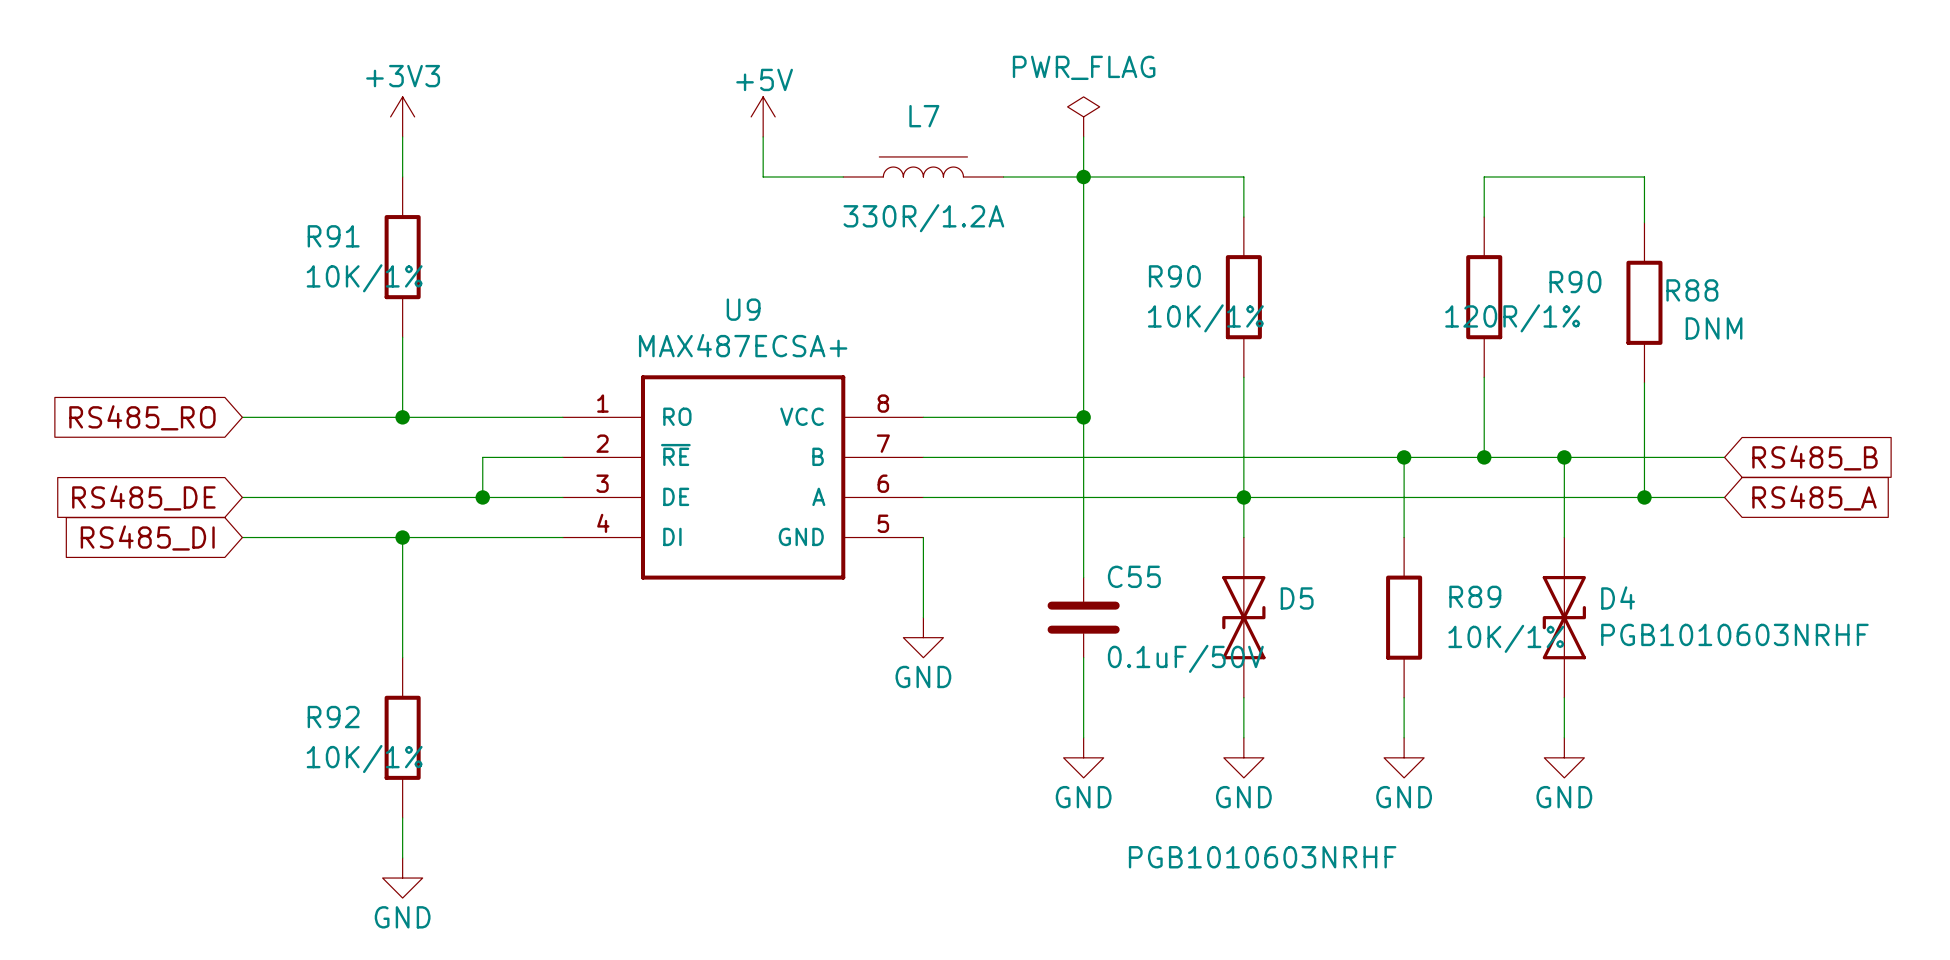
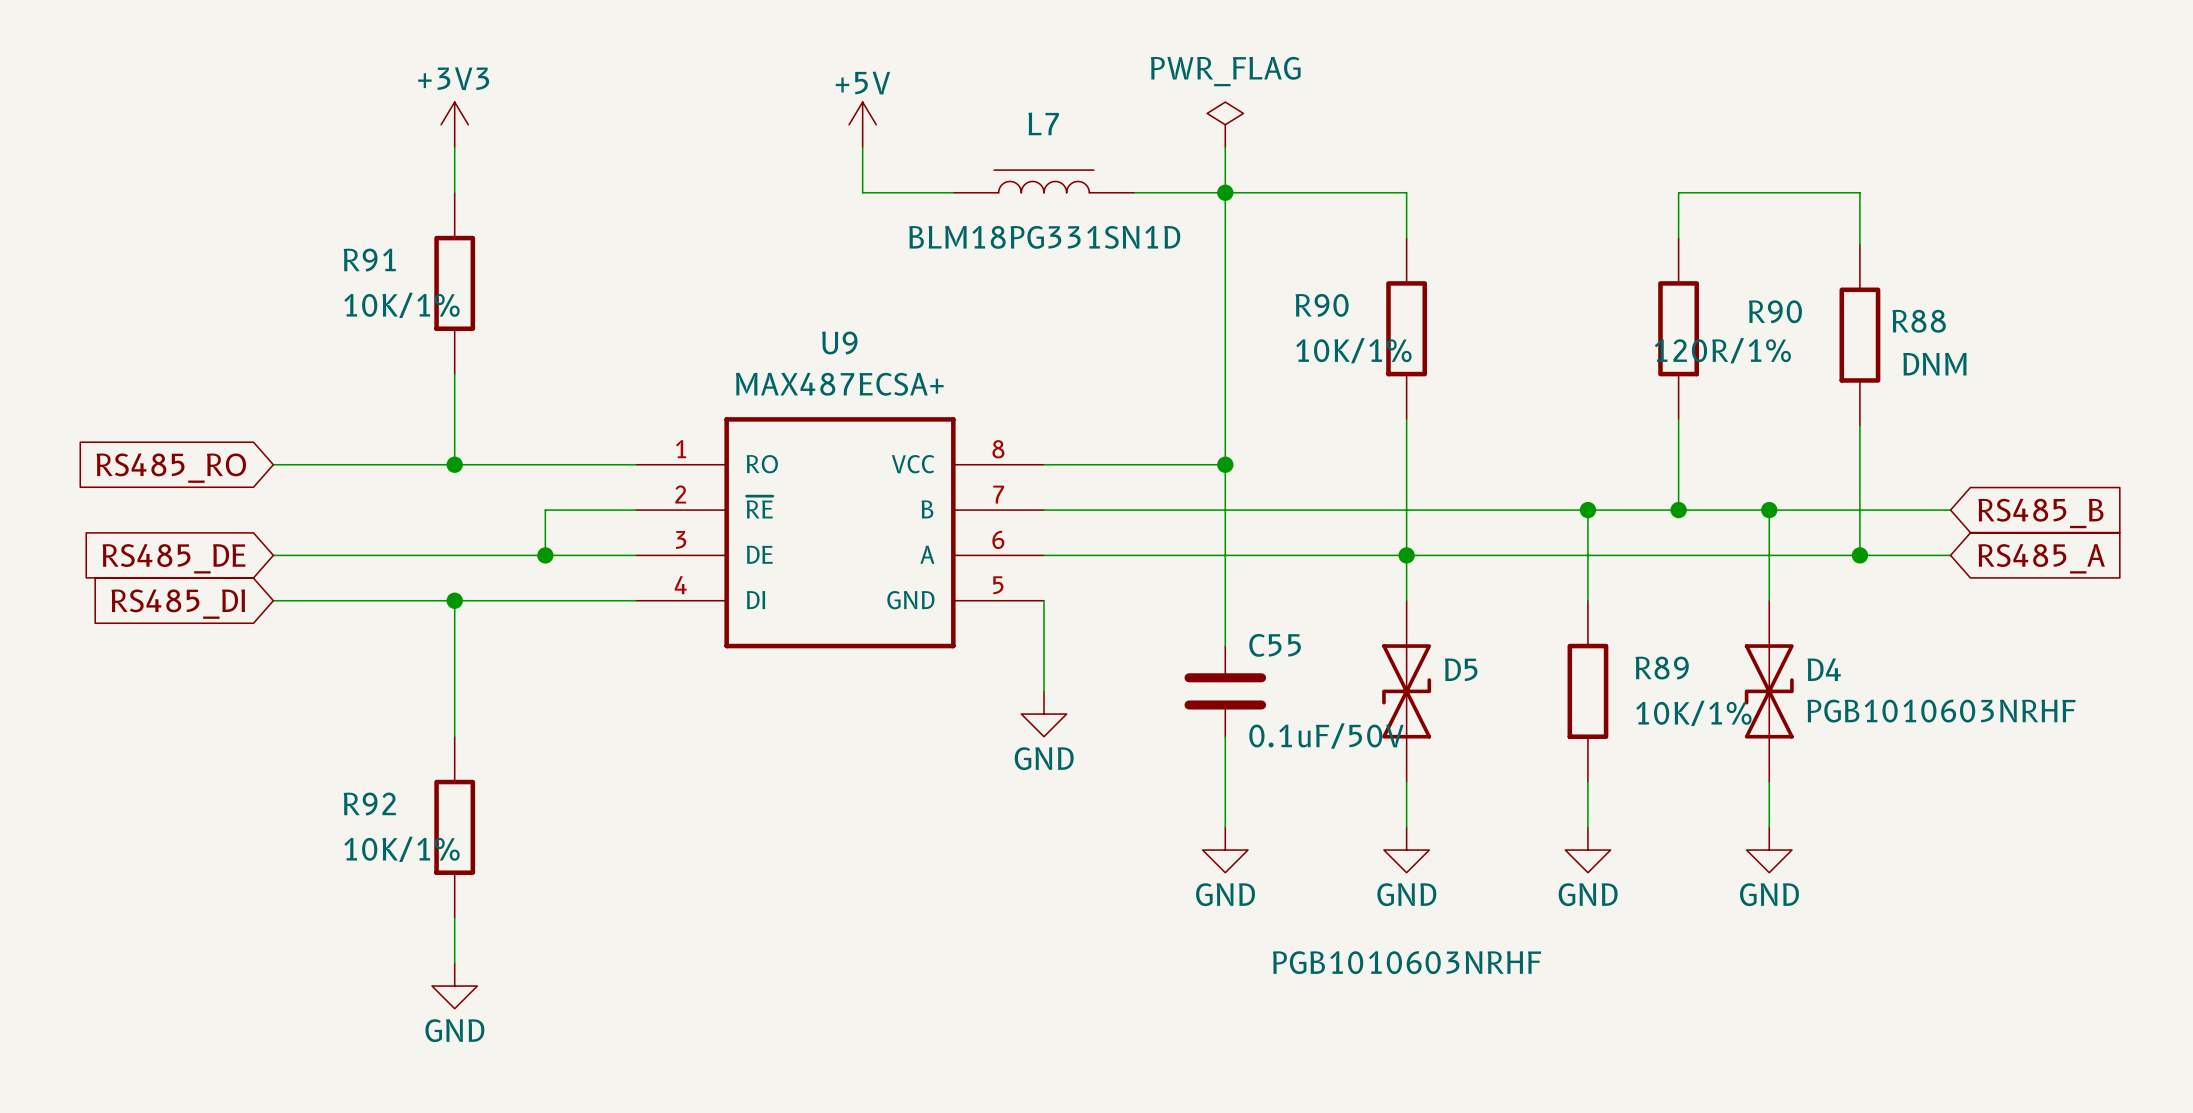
L7 value: 330R/1.2A (923, 218) -> BLM18PG331SN1D (1044, 237)

